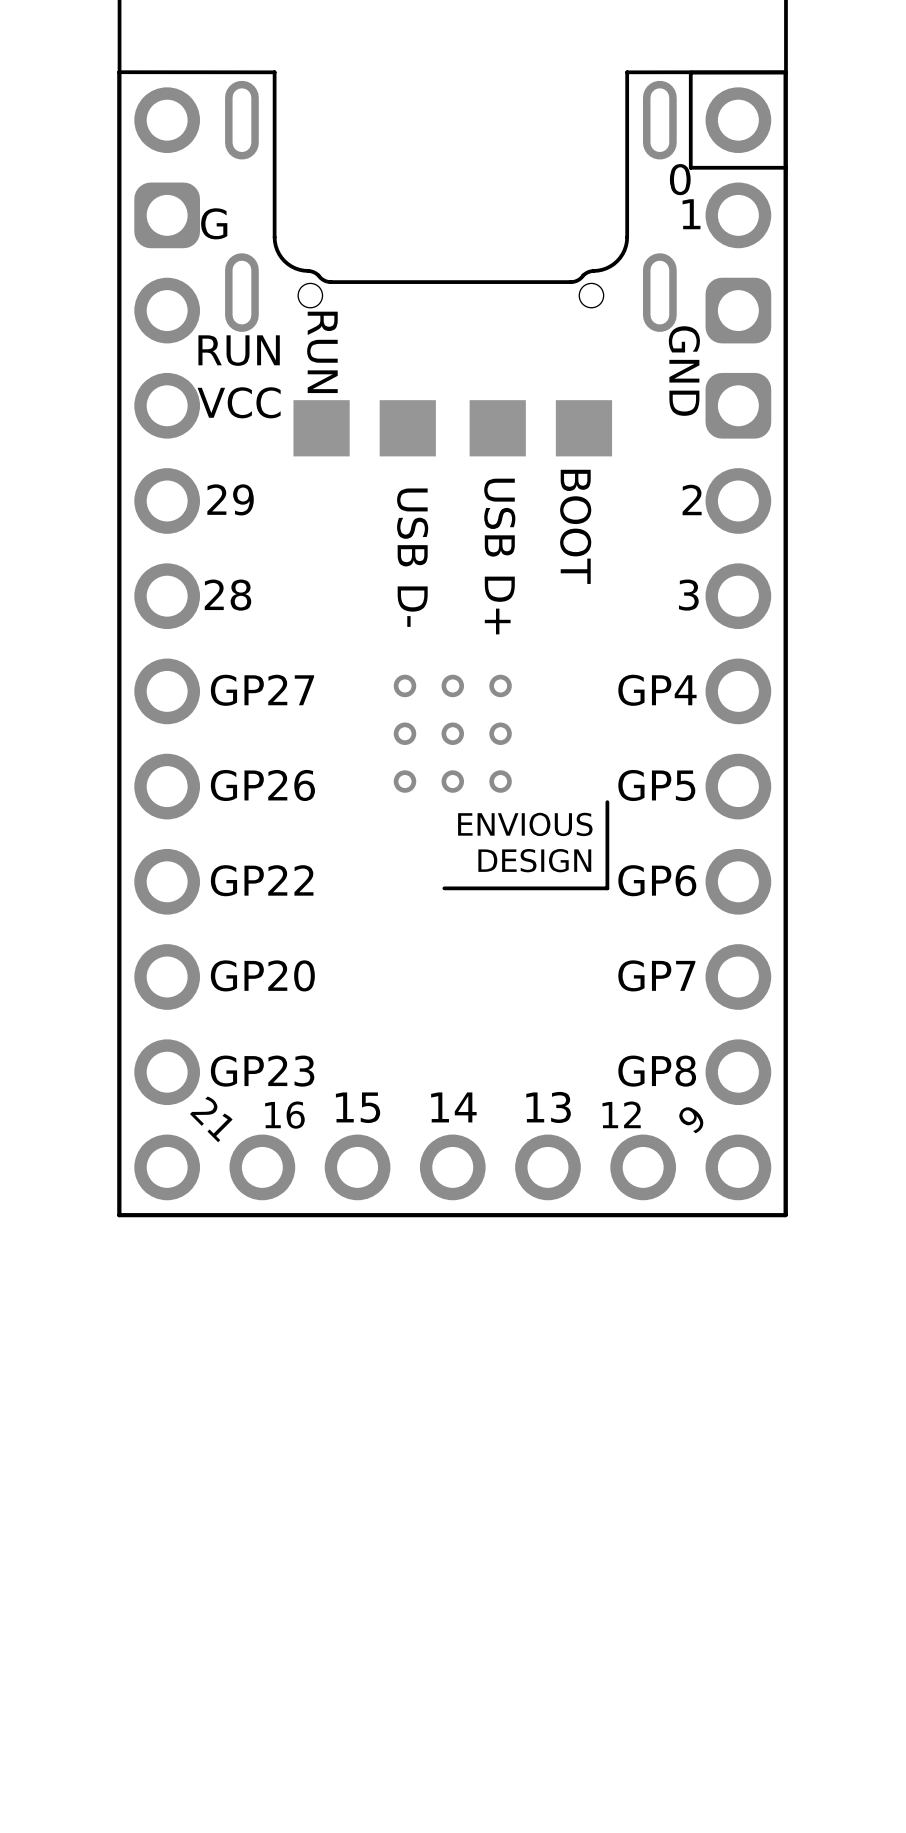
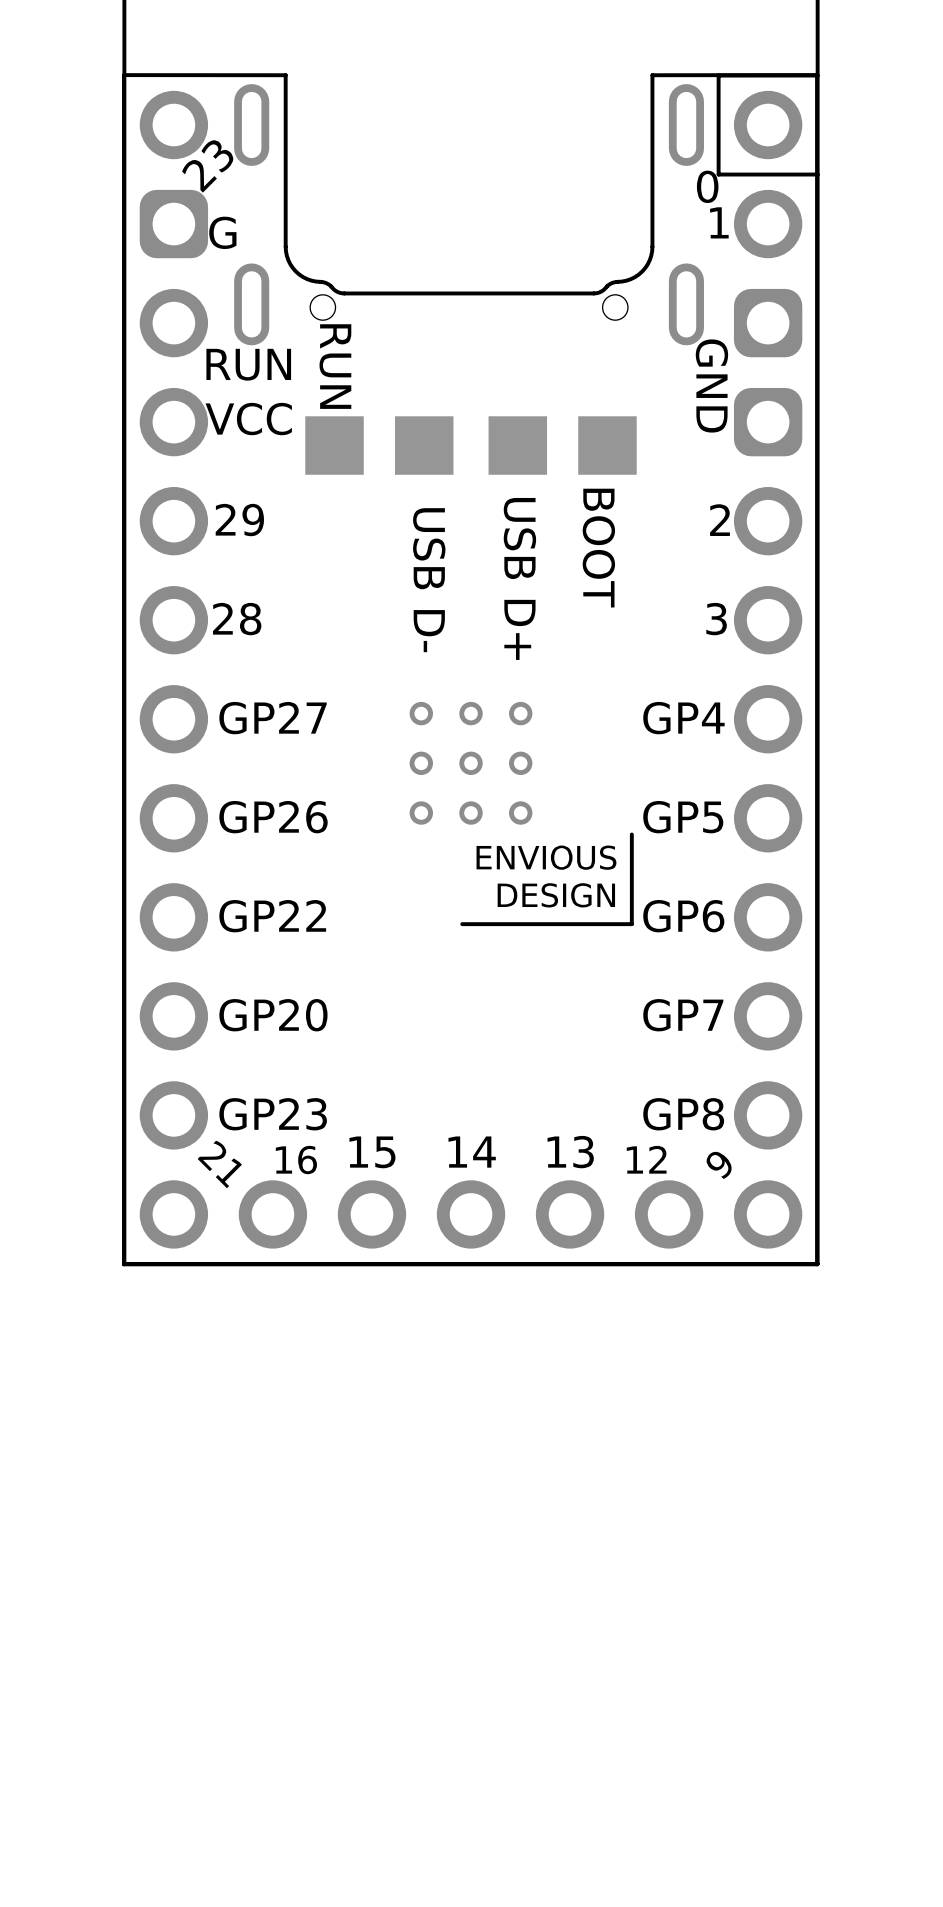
part text: none -> 23 (207, 166)

